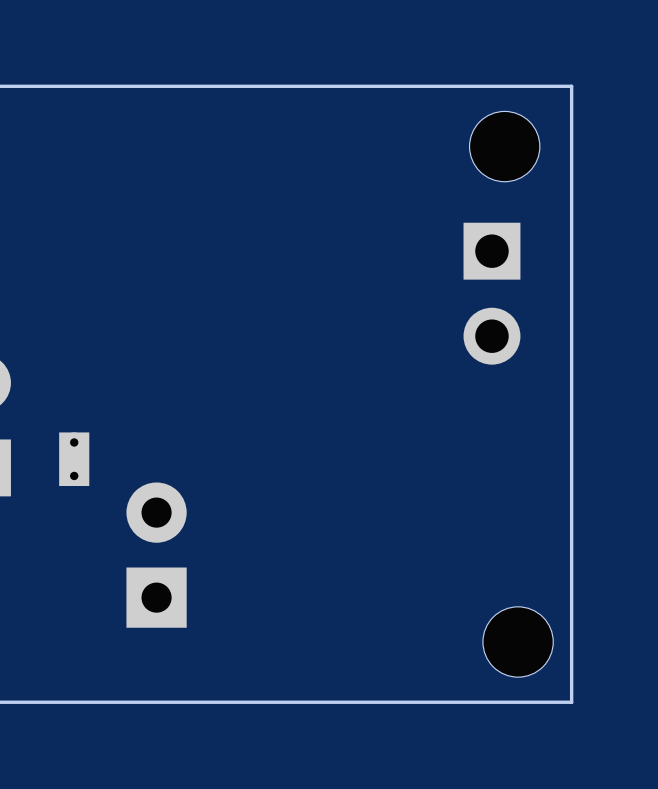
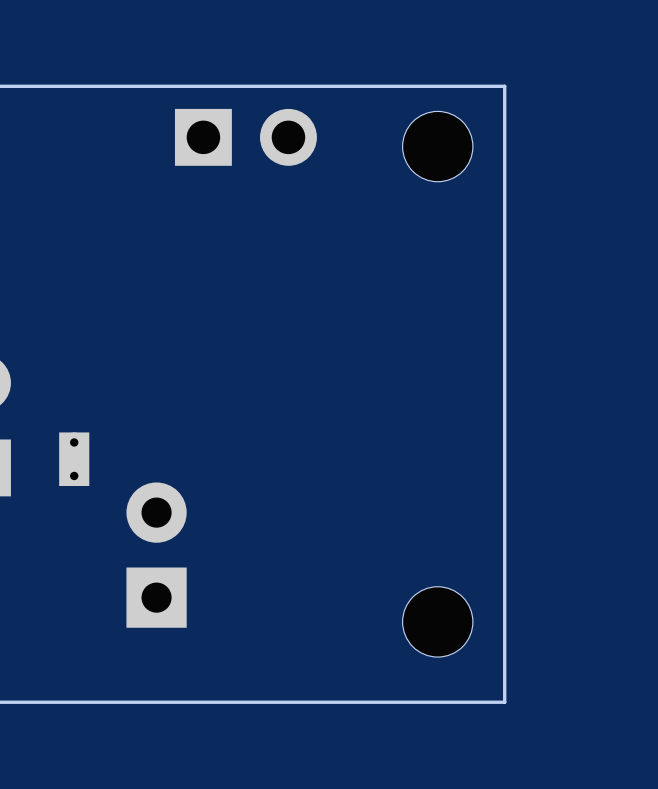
board edge: (504, 86) (571, 86) (571, 702) (504, 702) -> (504, 86) (504, 702)
part position: (504, 146) -> (437, 146)
part rotation: 0° (491, 293) -> 90° counterclockwise (245, 137)
part position: (491, 293) -> (245, 137)
part position: (518, 641) -> (437, 621)

